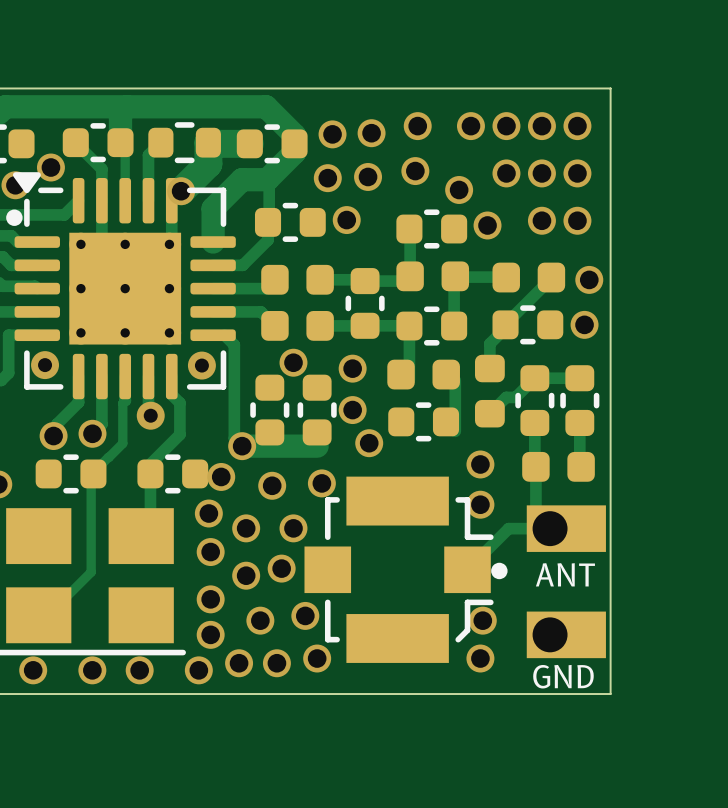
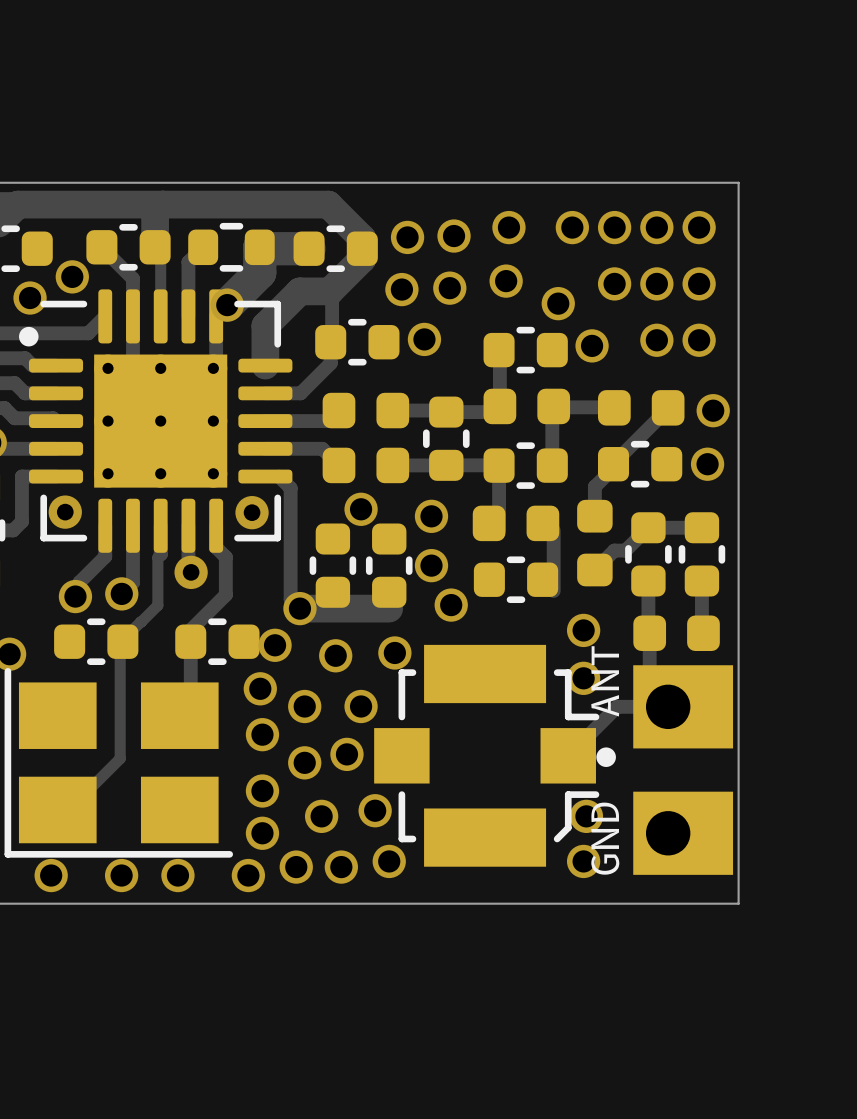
part footprint: [12, 172, 236, 400] -> [28, 289, 293, 553]
part footprint: [526, 505, 606, 552] -> [633, 665, 734, 749]
text rotation: 0° (565, 574) -> 90° counterclockwise (605, 681)
text position: ANT (565, 574) -> ANT (605, 681)
part footprint: [526, 611, 606, 659] -> [633, 791, 734, 875]
text rotation: 0° (563, 676) -> 90° counterclockwise (605, 838)

